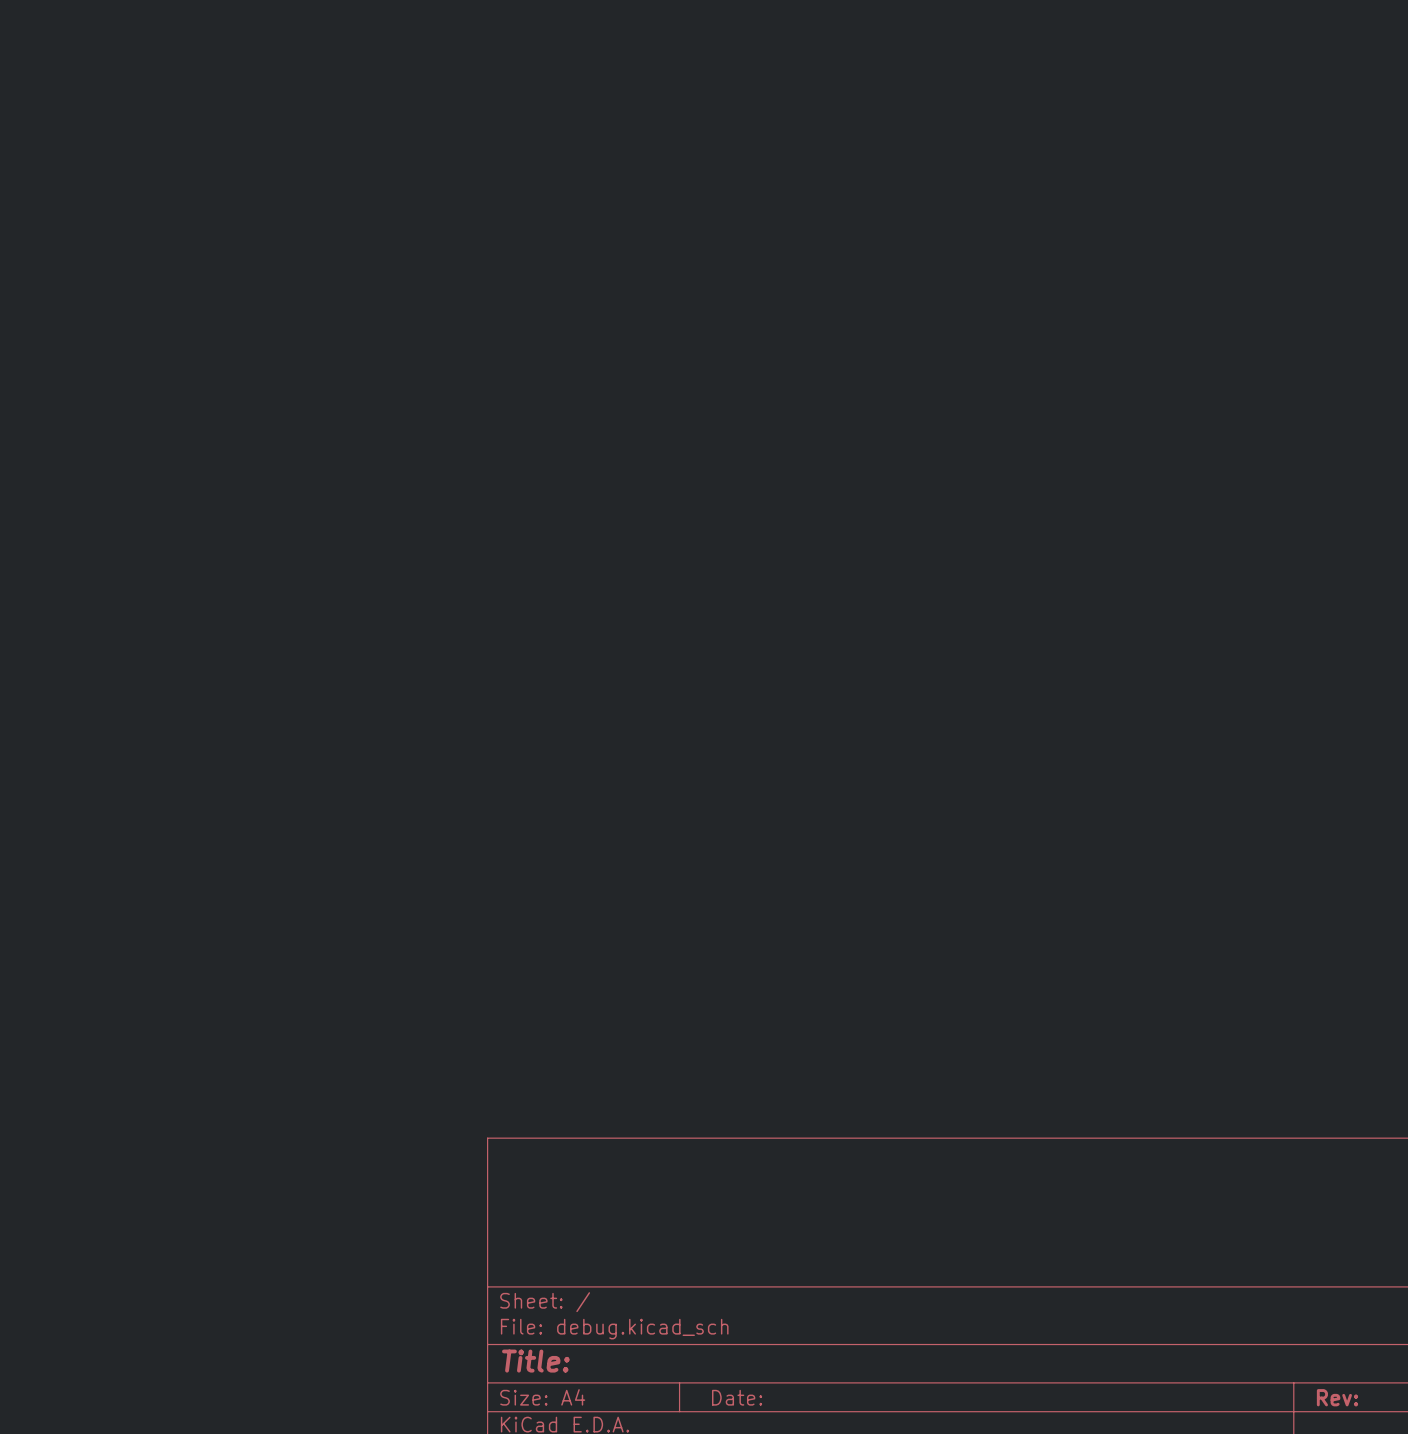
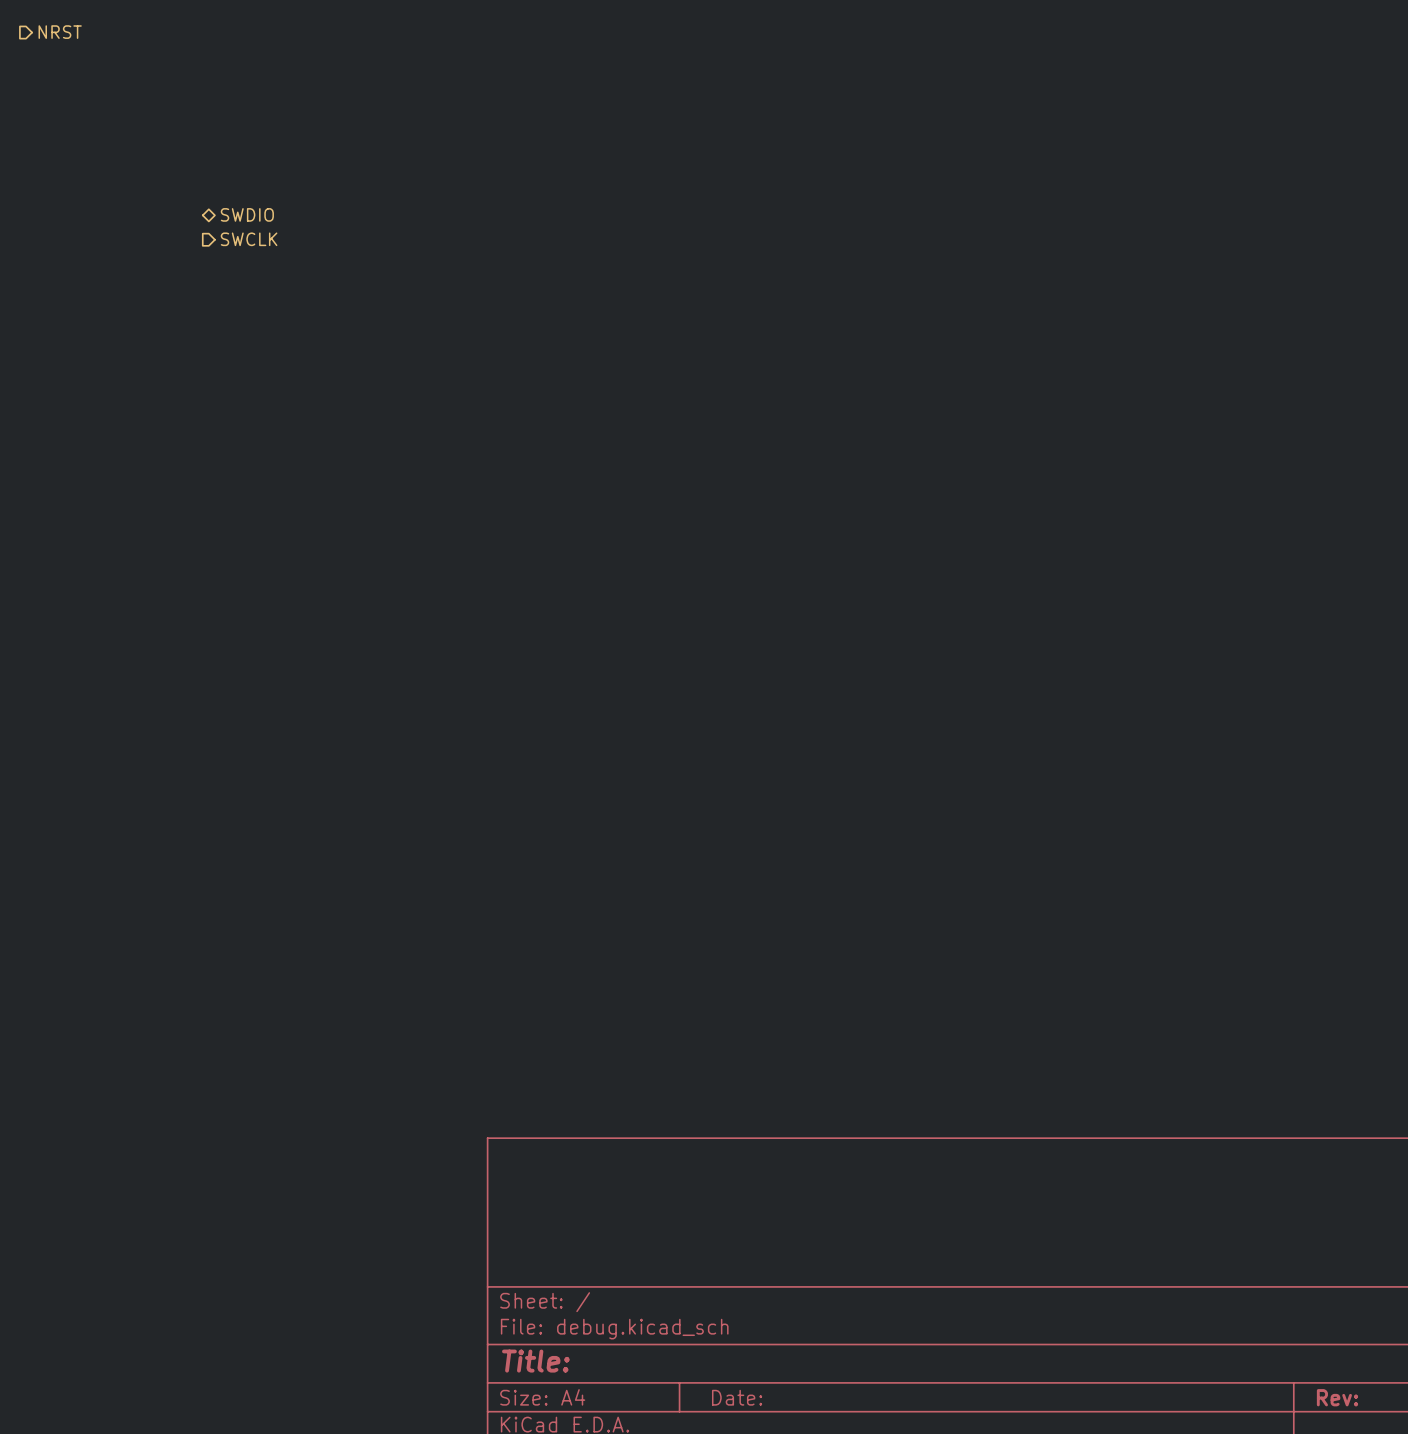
hierarchical label: none -> NRST (60, 32)
hierarchical label: none -> SWDIO (247, 214)
hierarchical label: none -> SWCLK (249, 239)

